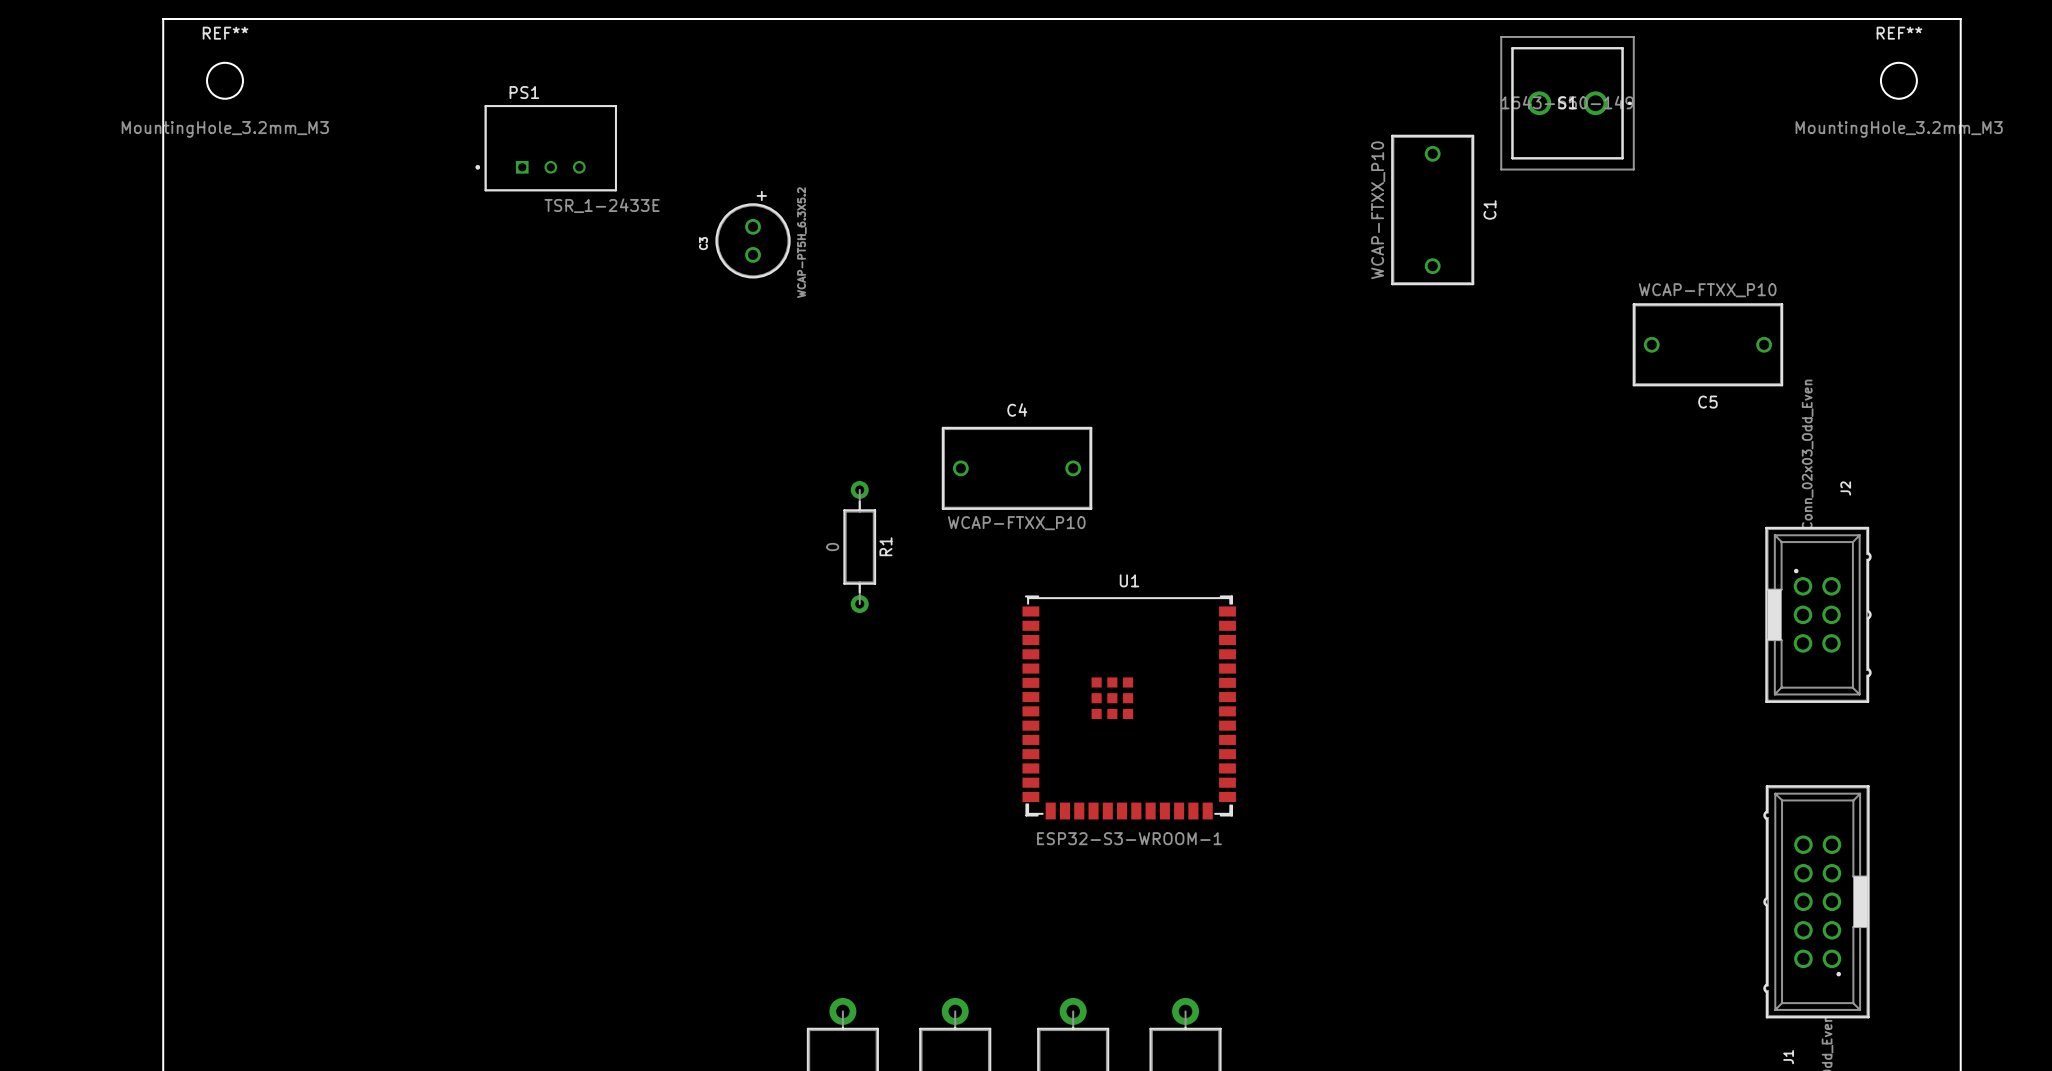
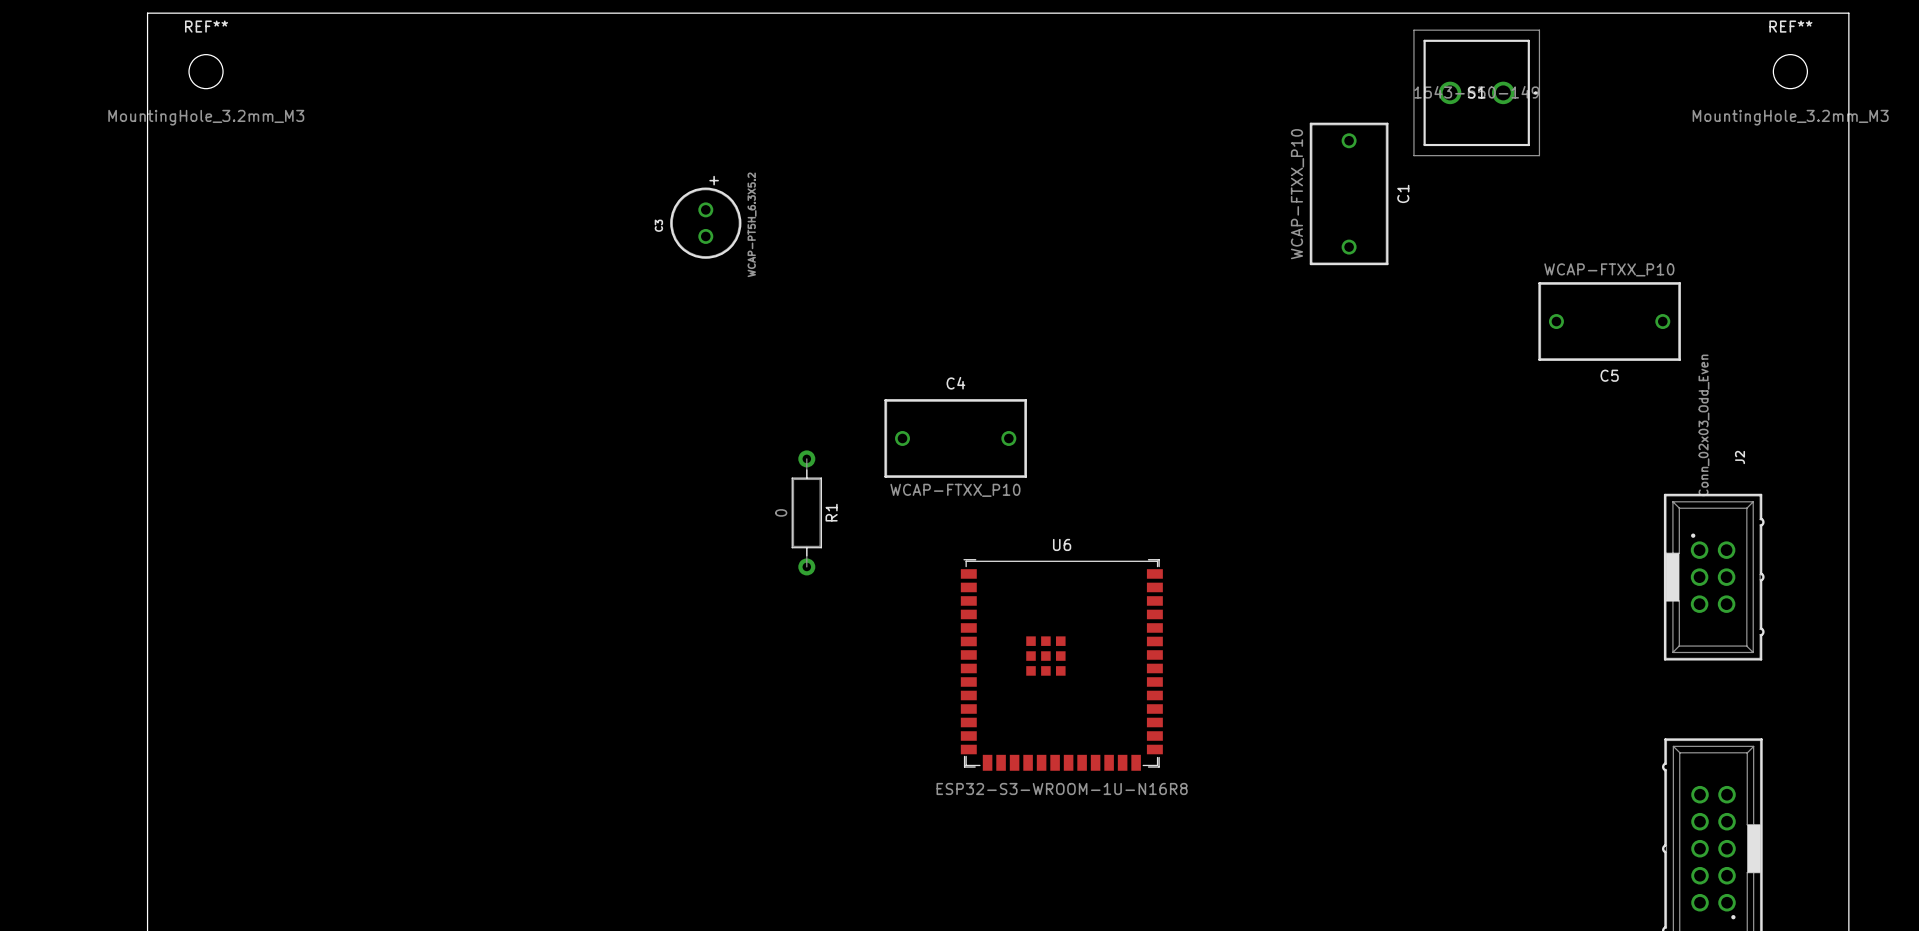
PS1: TSR_1-2433E (546, 148) -> none
U1 name: U1 (1129, 580) -> U6 (1062, 544)
U1 value: ESP32-S3-WROOM-1 (1129, 838) -> ESP32-S3-WROOM-1U-N16R8 (1062, 788)

